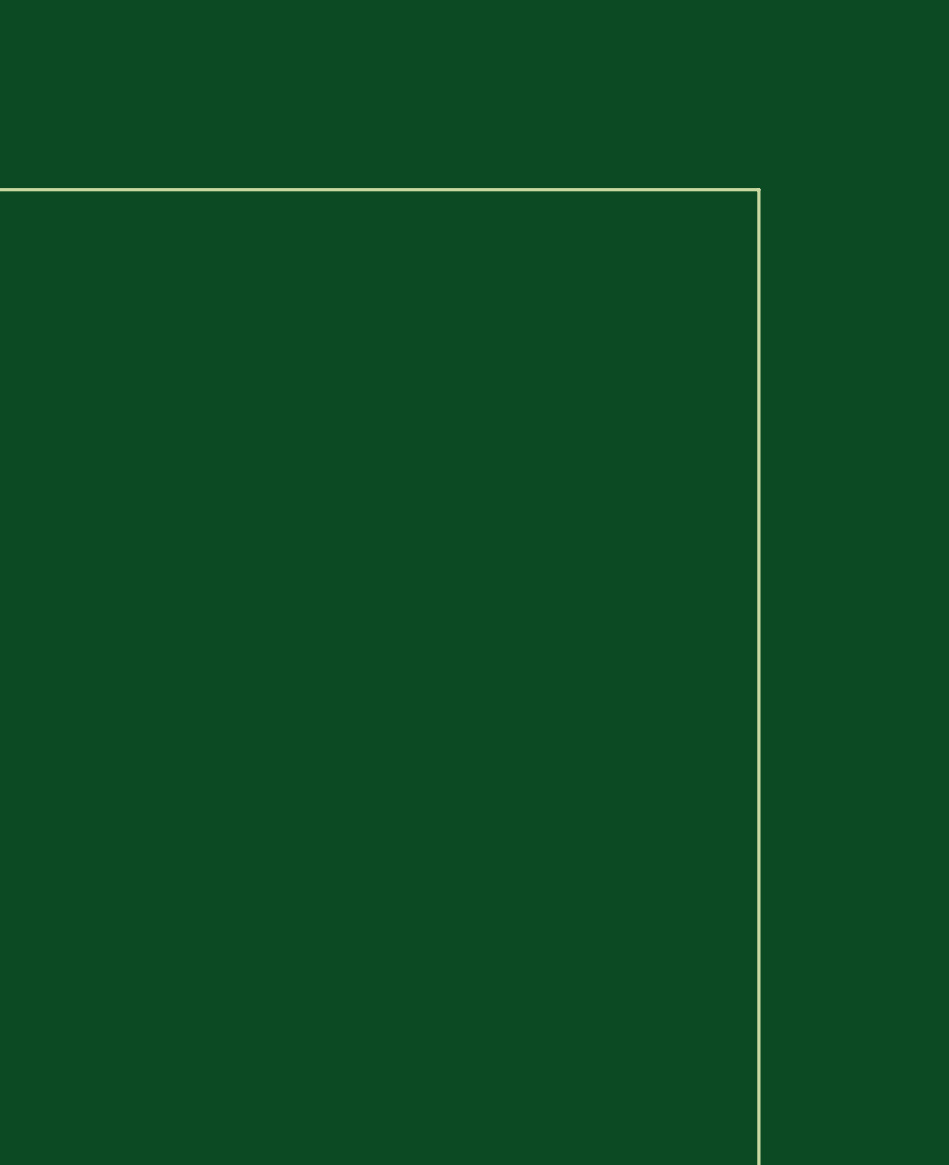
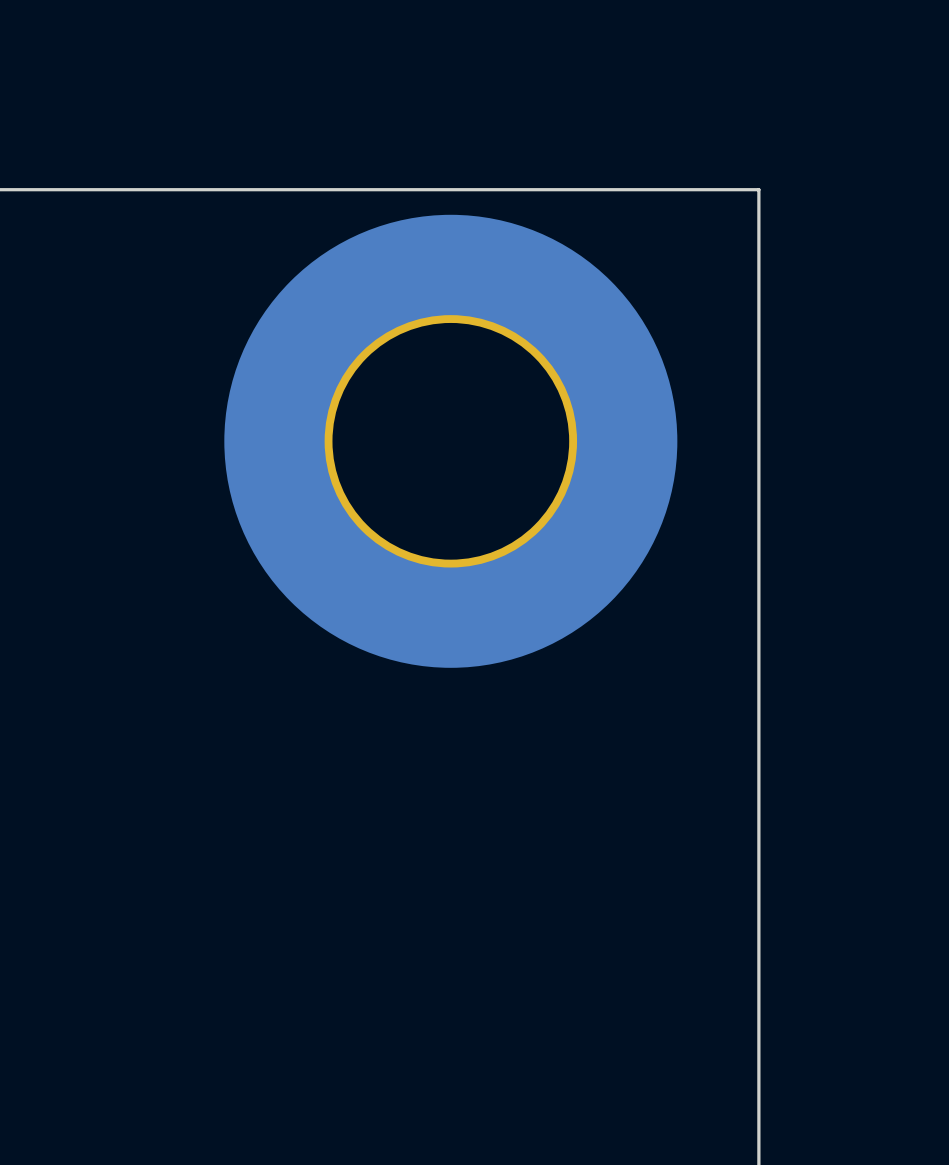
part: none -> (450, 441)

